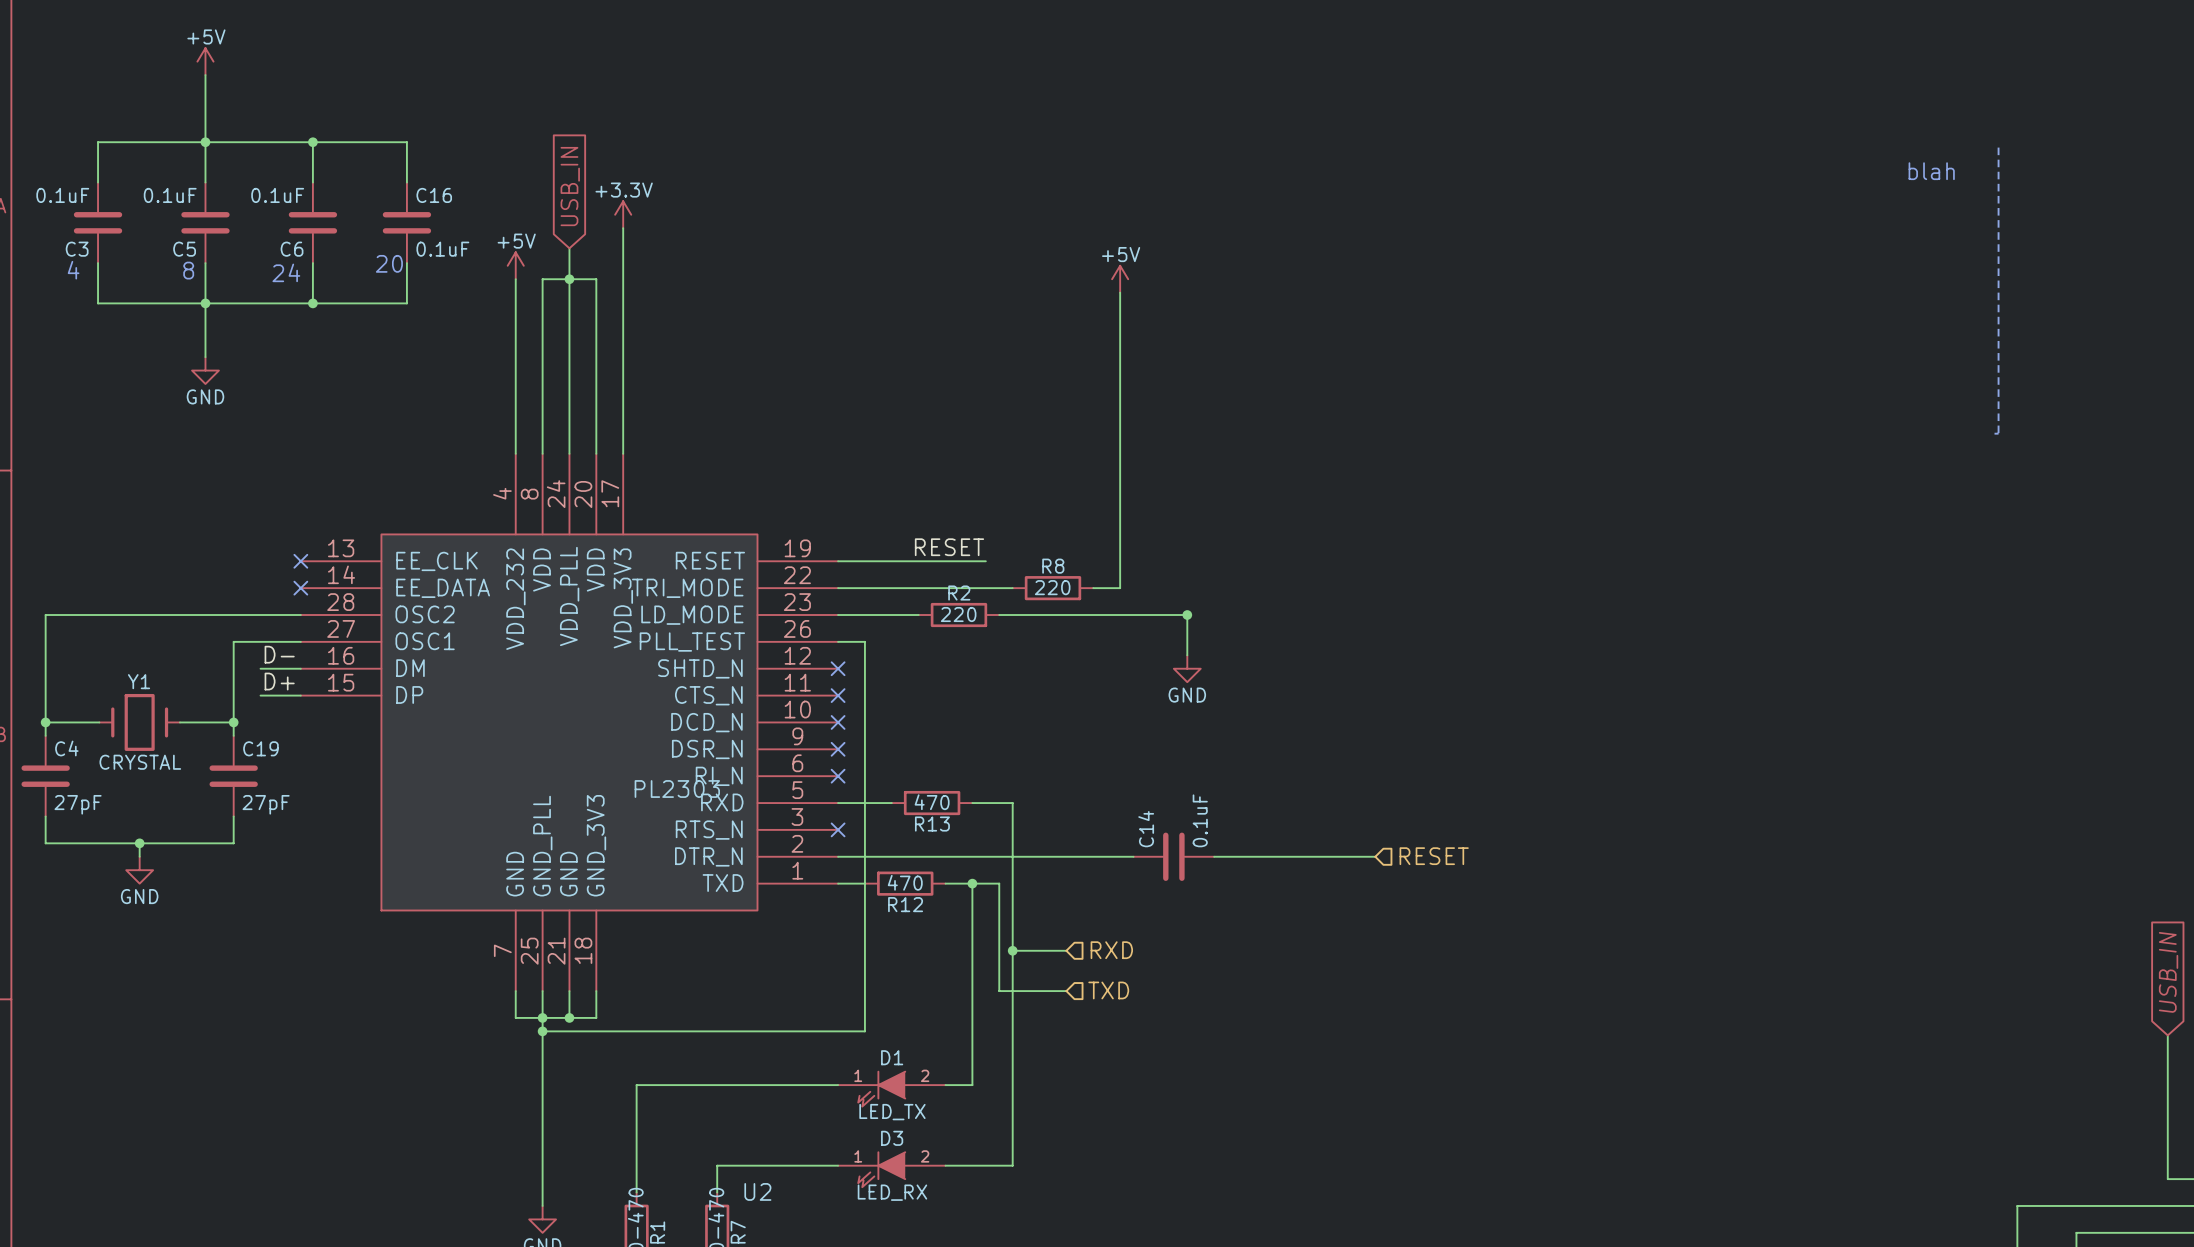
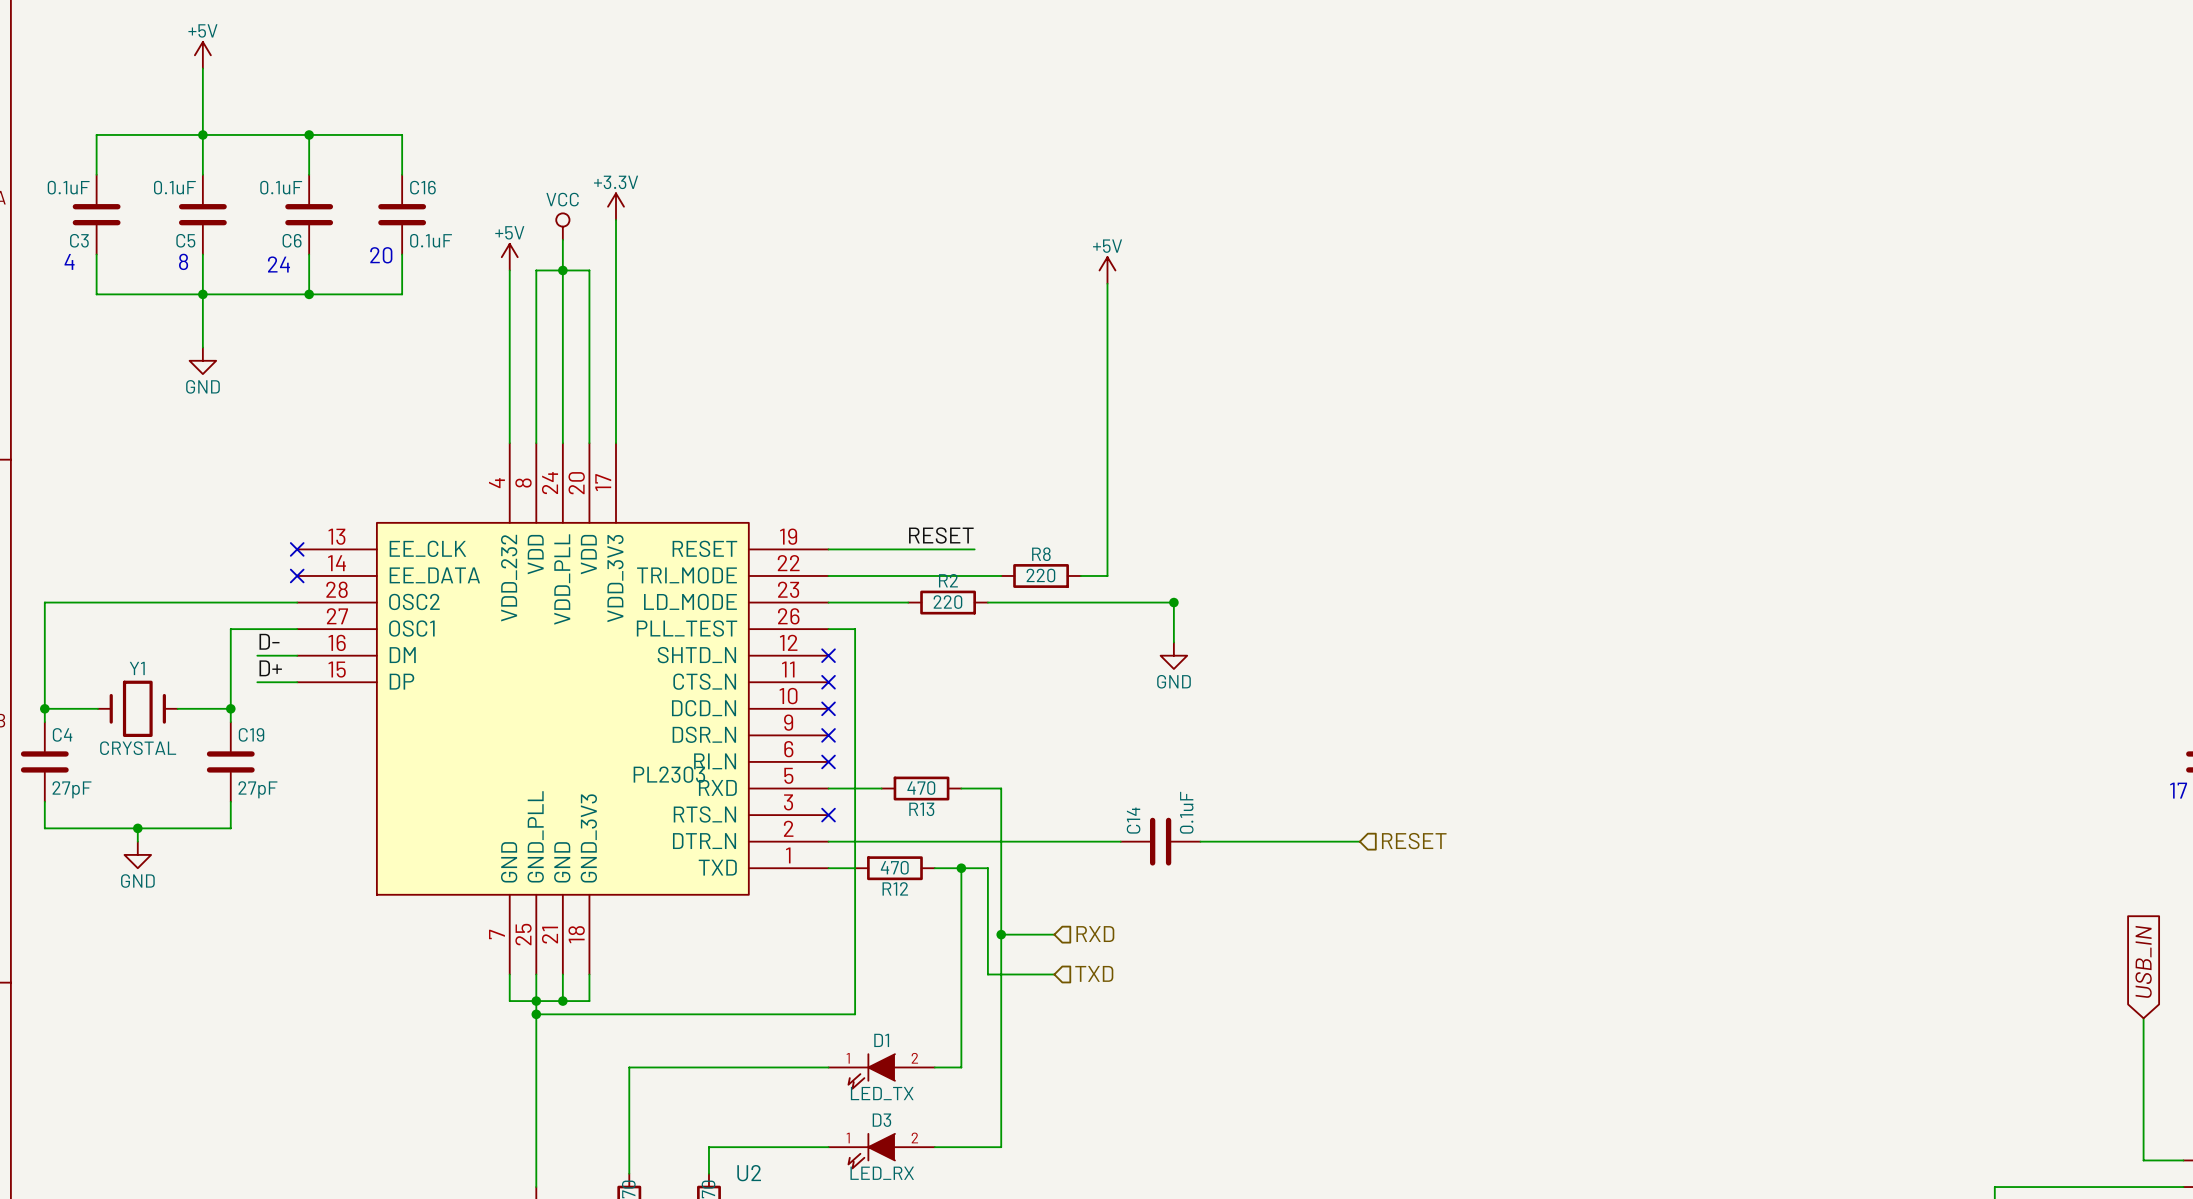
line: (1998, 147) (1998, 433) (1994, 433) -> none
text: blah (1931, 171) -> none
global label: USB_IN (570, 186) -> none
power symbol: none -> VCC (562, 226)

